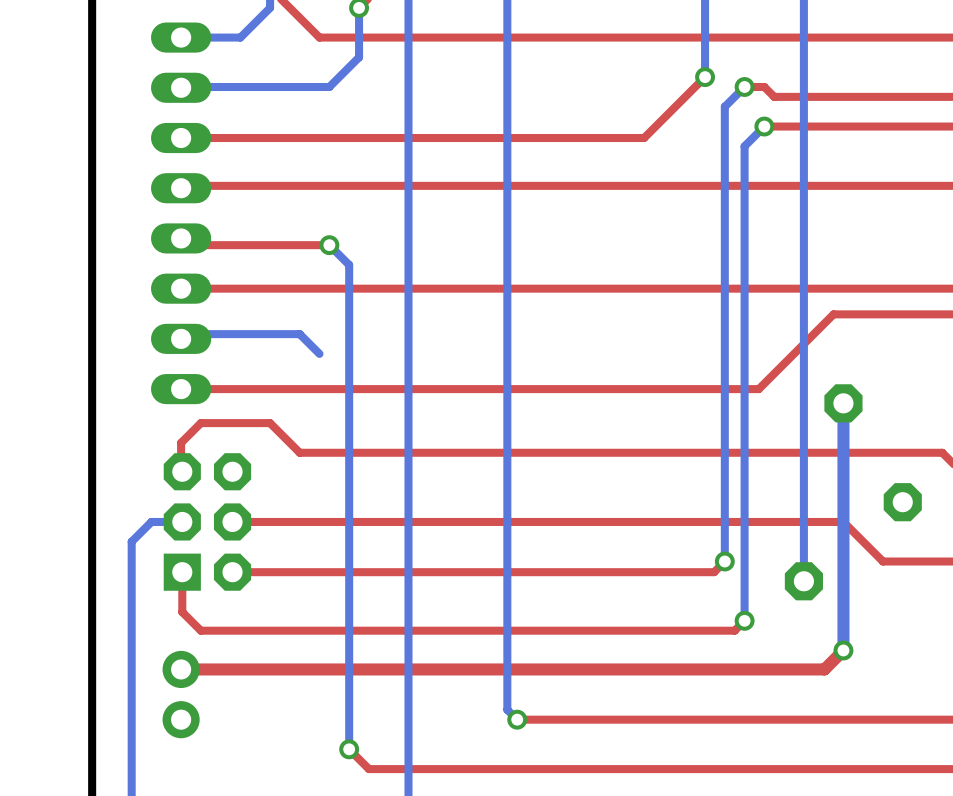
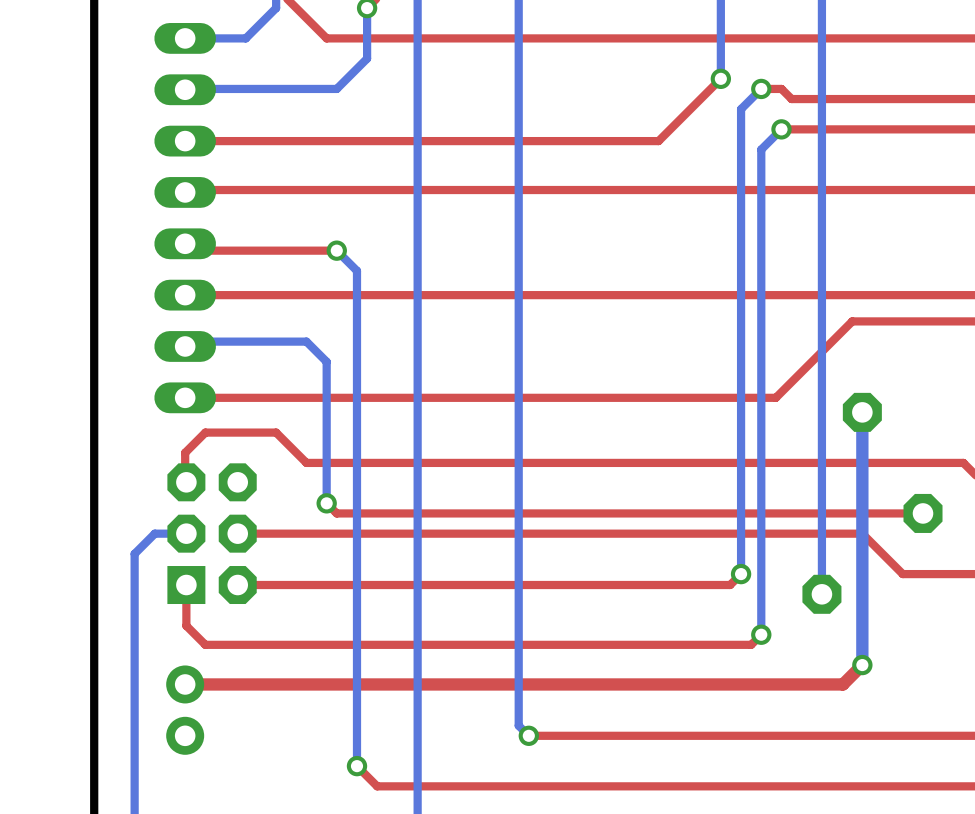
bottom track: none -> (326, 361) (326, 503)
top track: none -> (326, 503) (336, 513) (923, 513)
via: none -> (326, 503)

